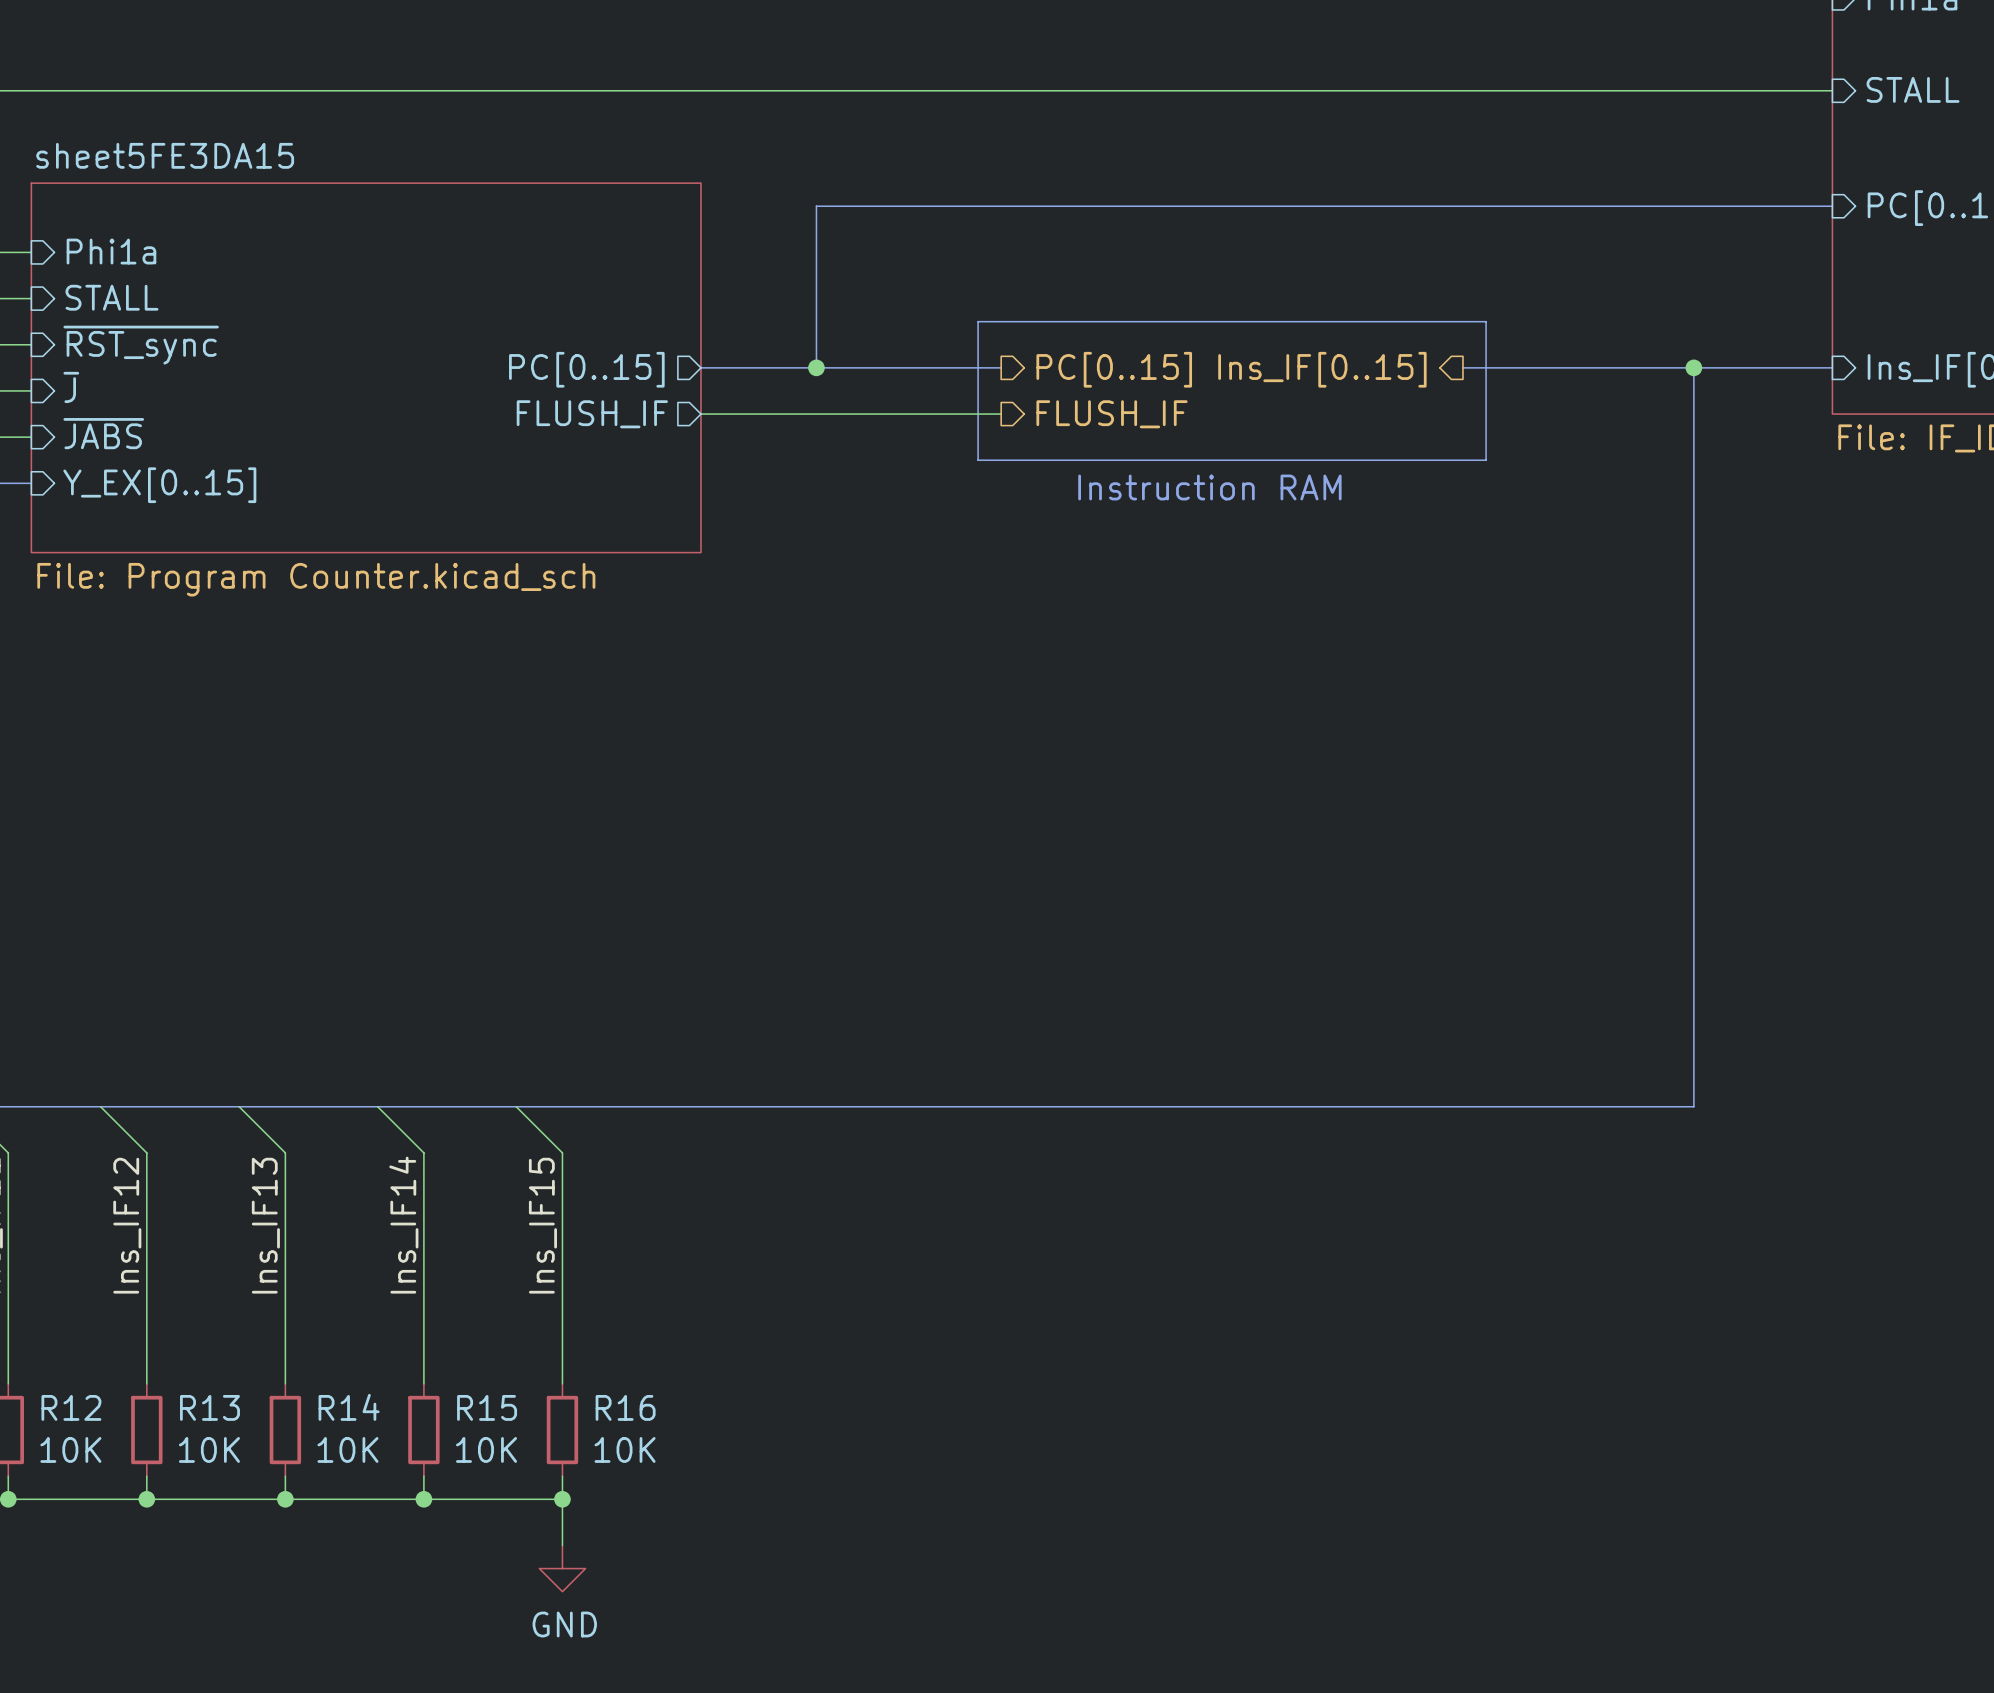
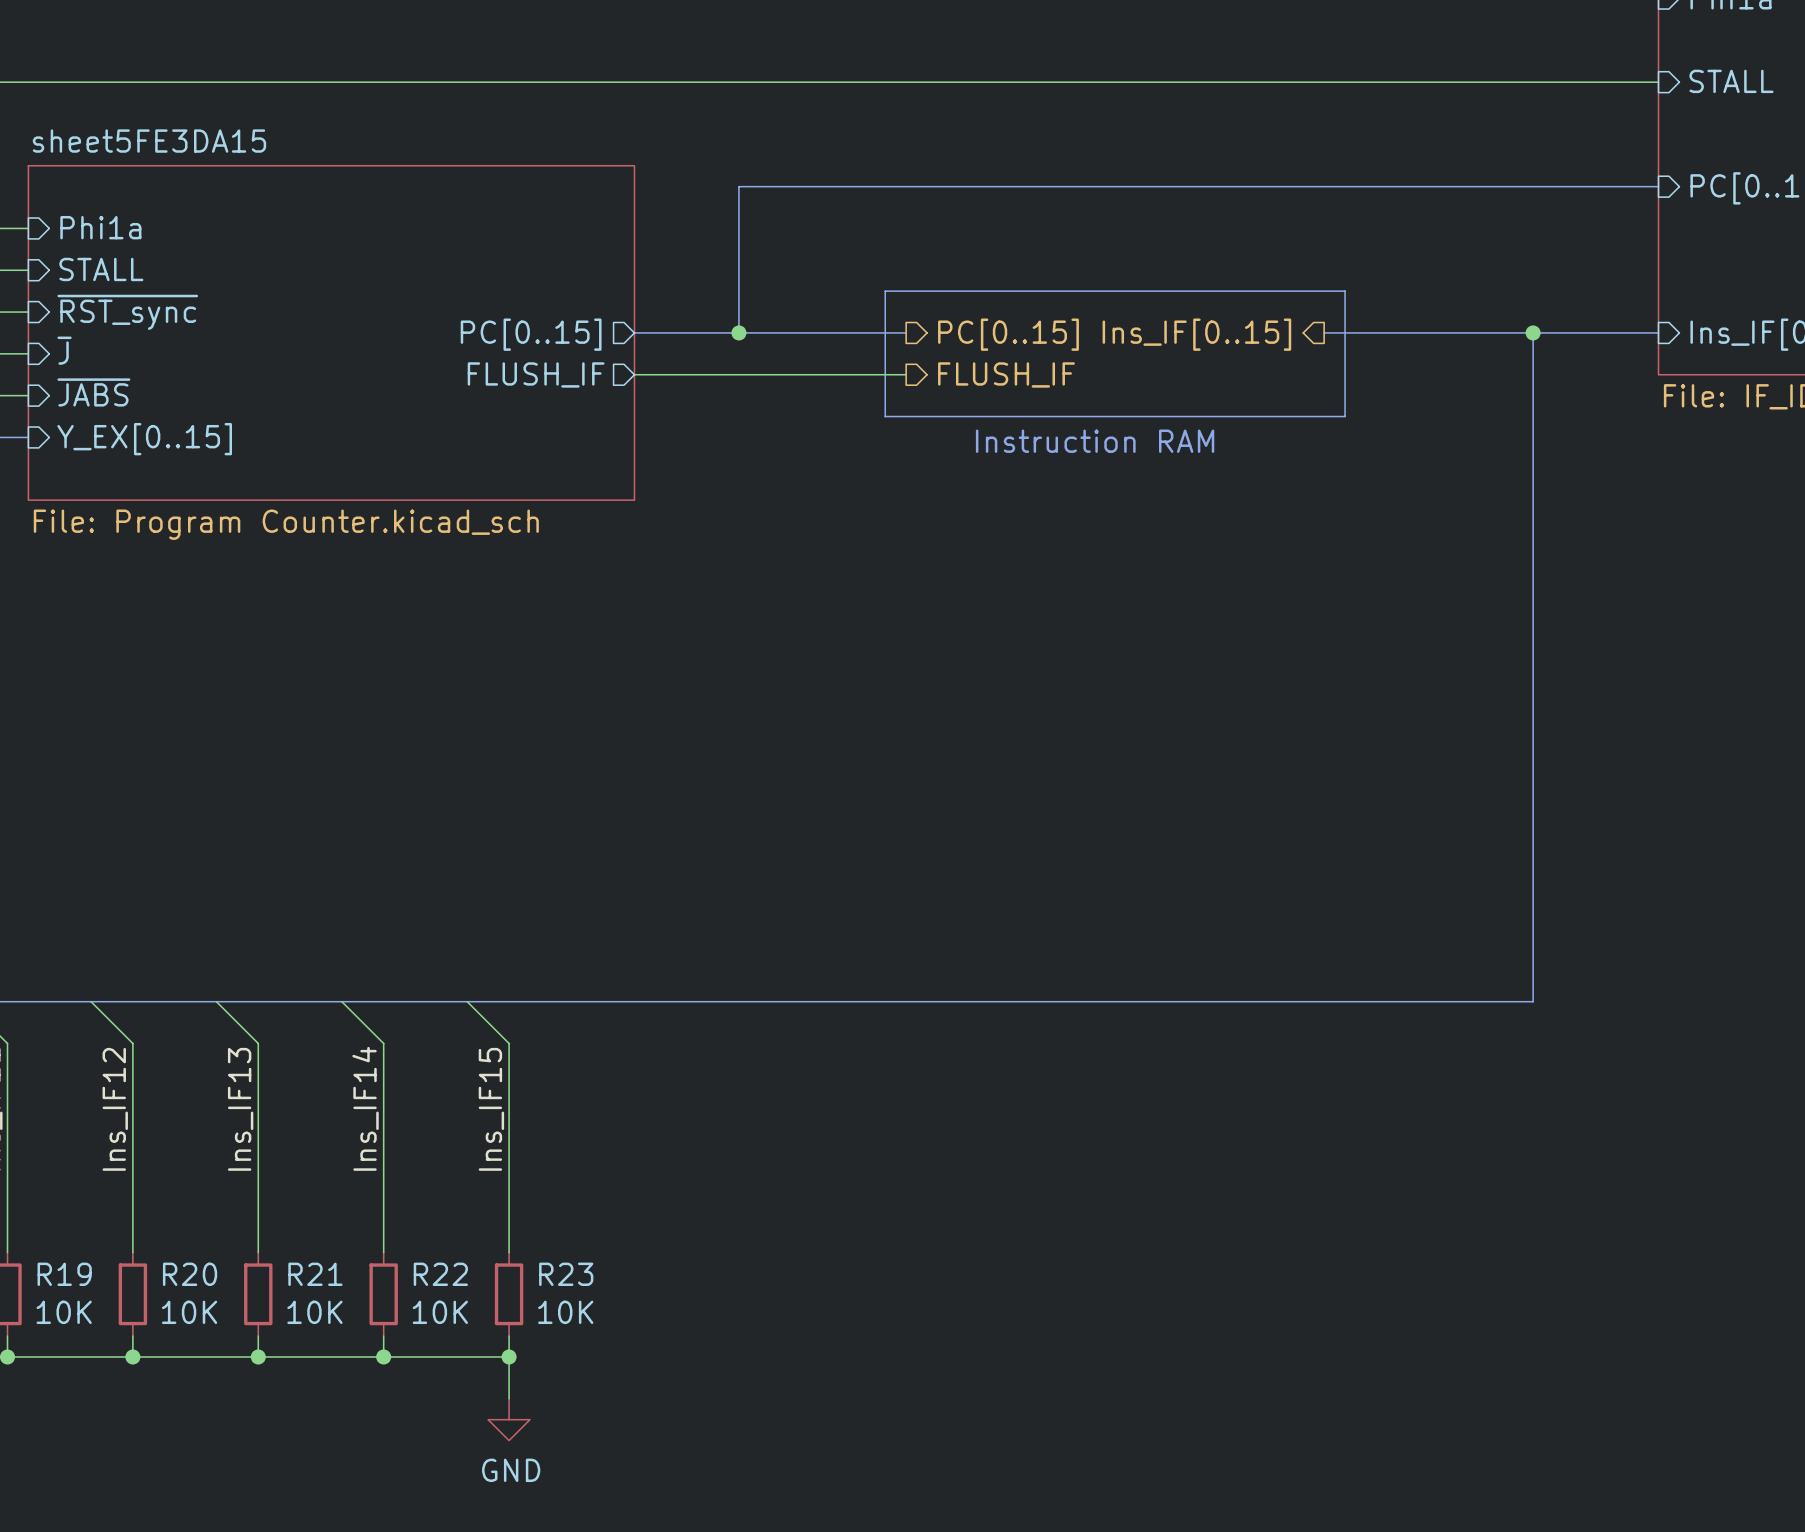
R12 name: R12 (71, 1407) -> R19 (64, 1274)
R13 name: R13 (209, 1407) -> R20 (190, 1274)
R14 name: R14 (349, 1407) -> R21 (315, 1274)
R15 name: R15 (487, 1407) -> R22 (440, 1274)
R16 name: R16 (625, 1407) -> R23 (566, 1274)

